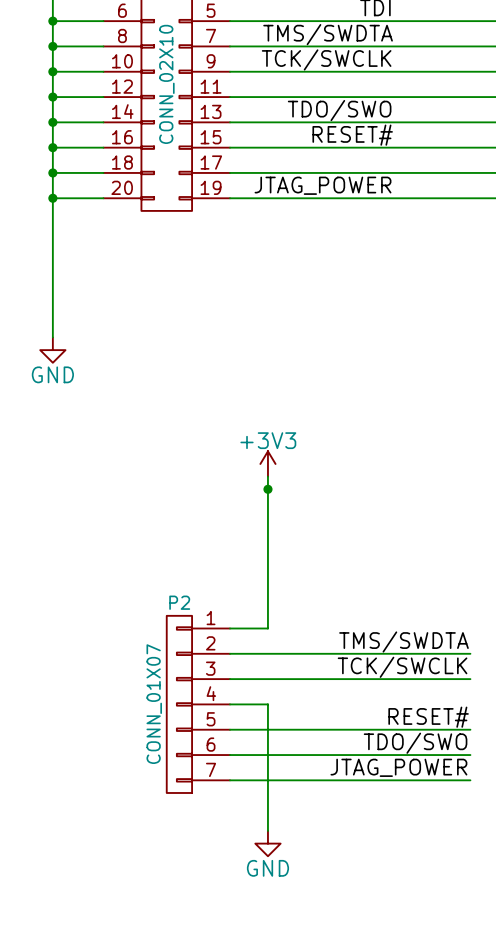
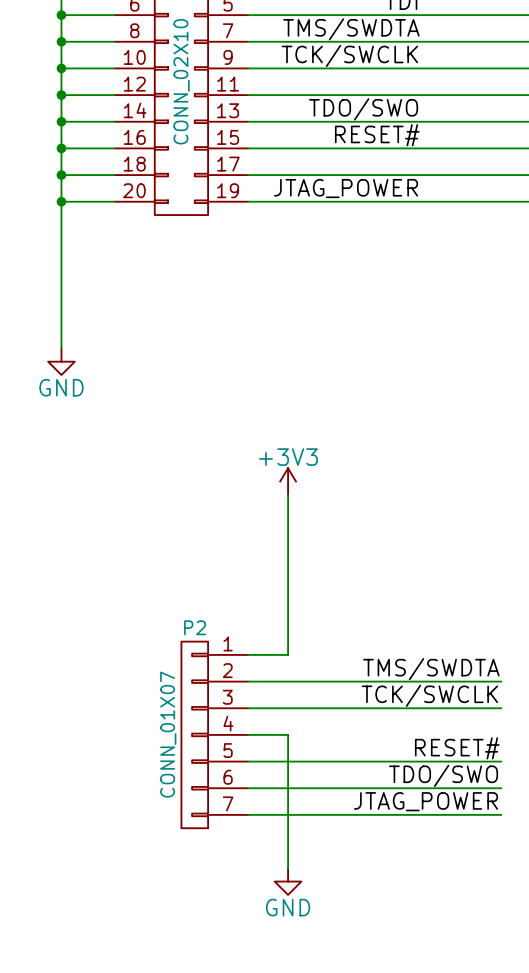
junction: (267, 489) -> none

